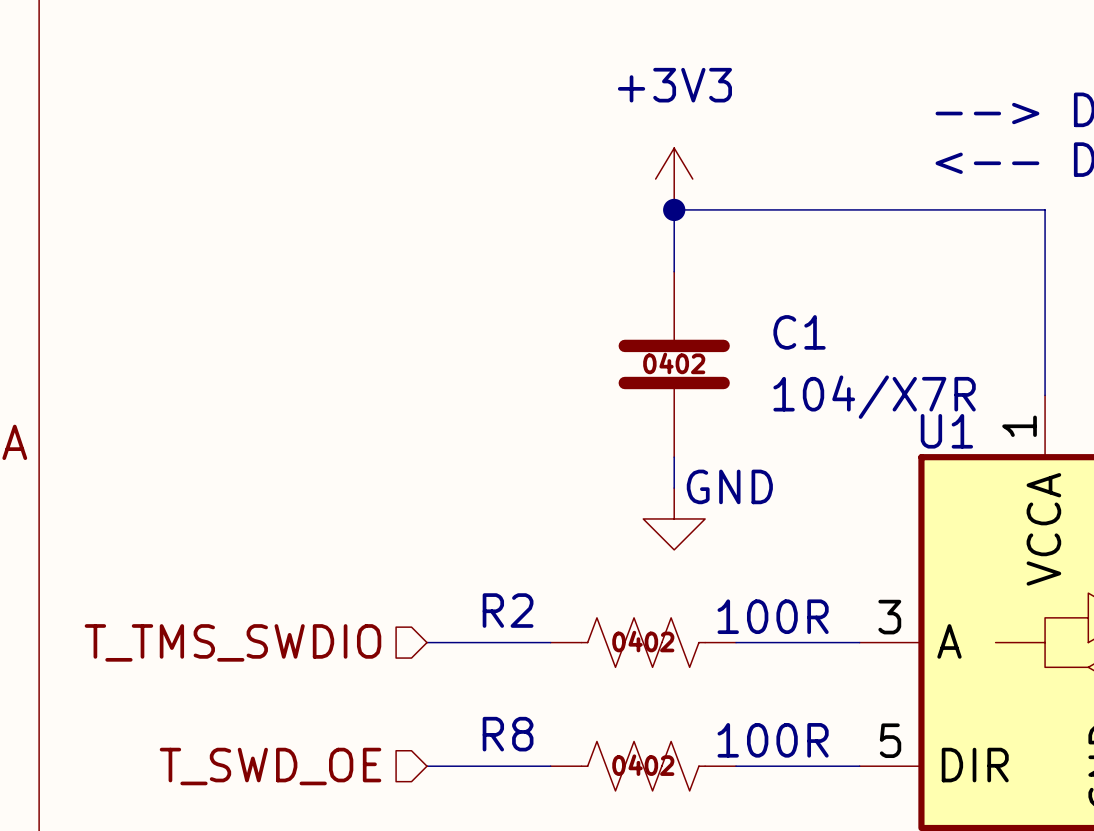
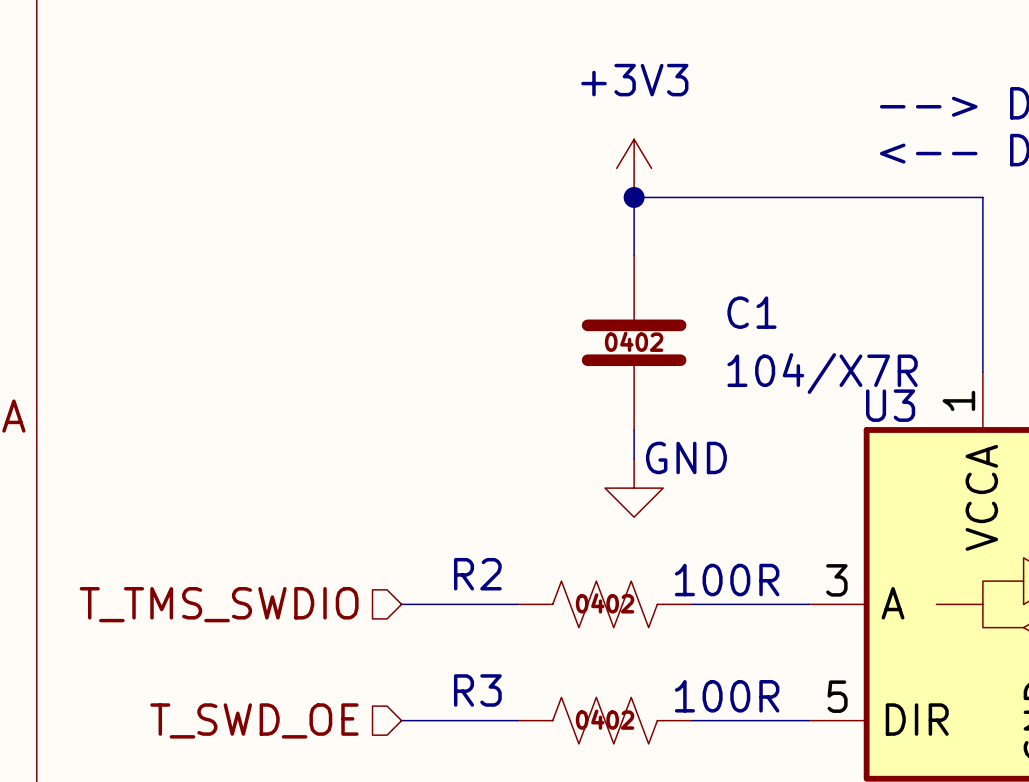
U1 name: U1 (946, 431) -> U3 (890, 405)
R8 name: R8 (508, 734) -> R3 (477, 690)

